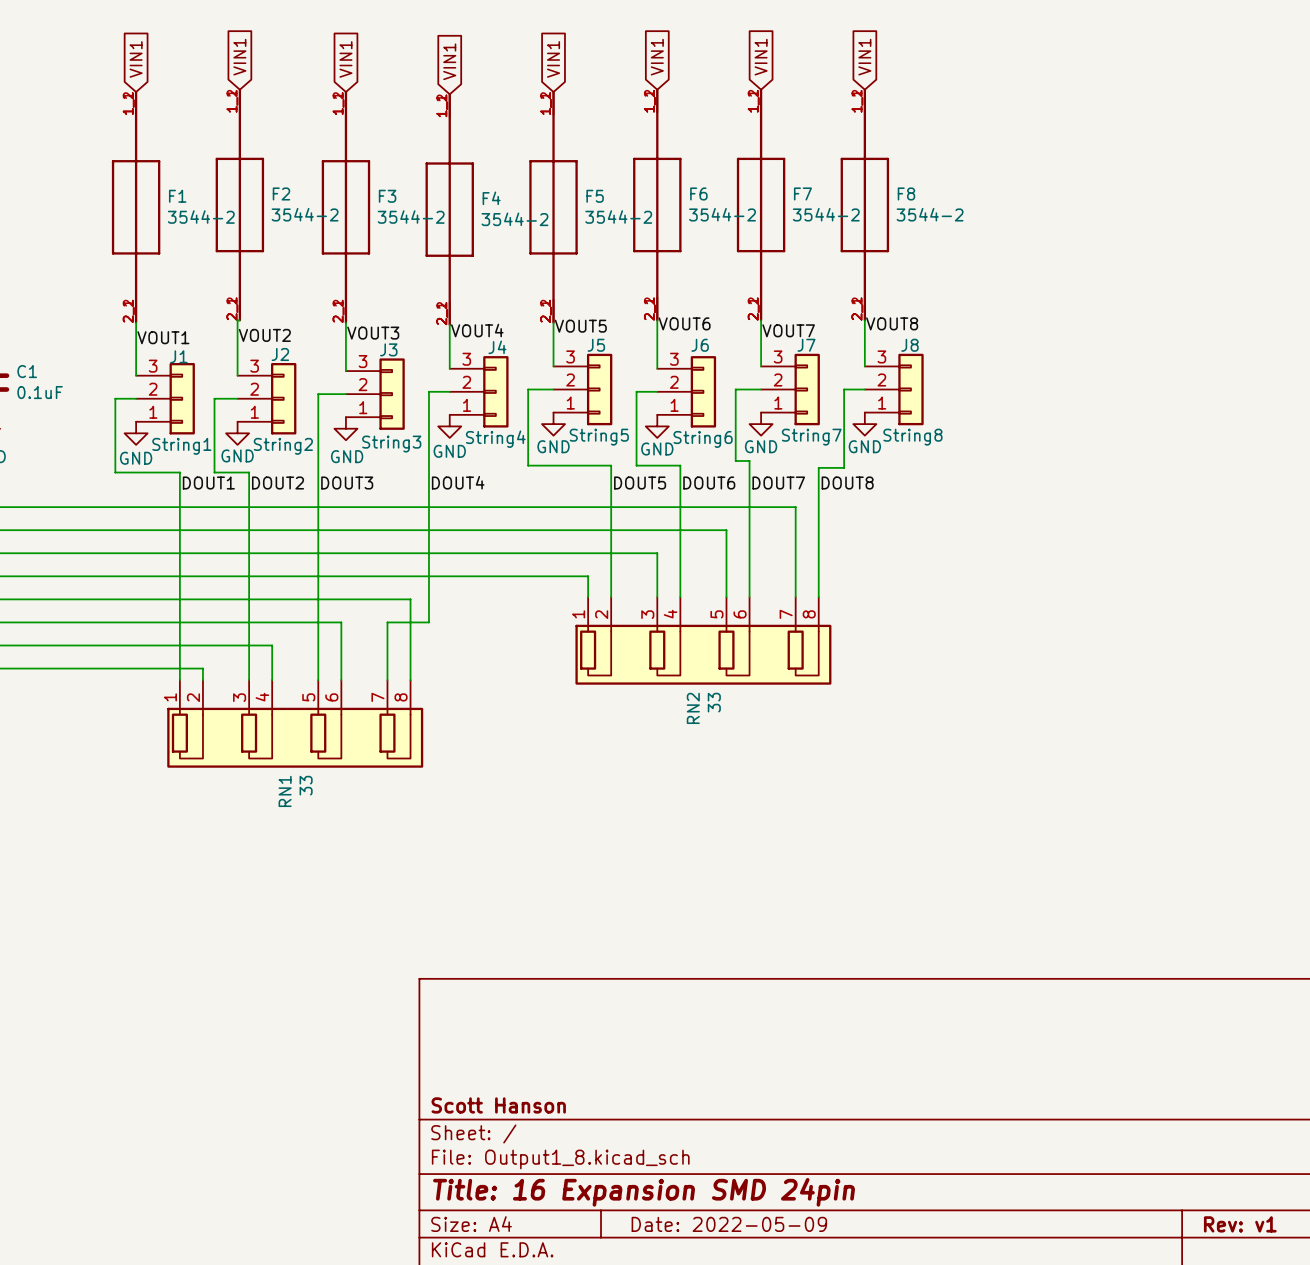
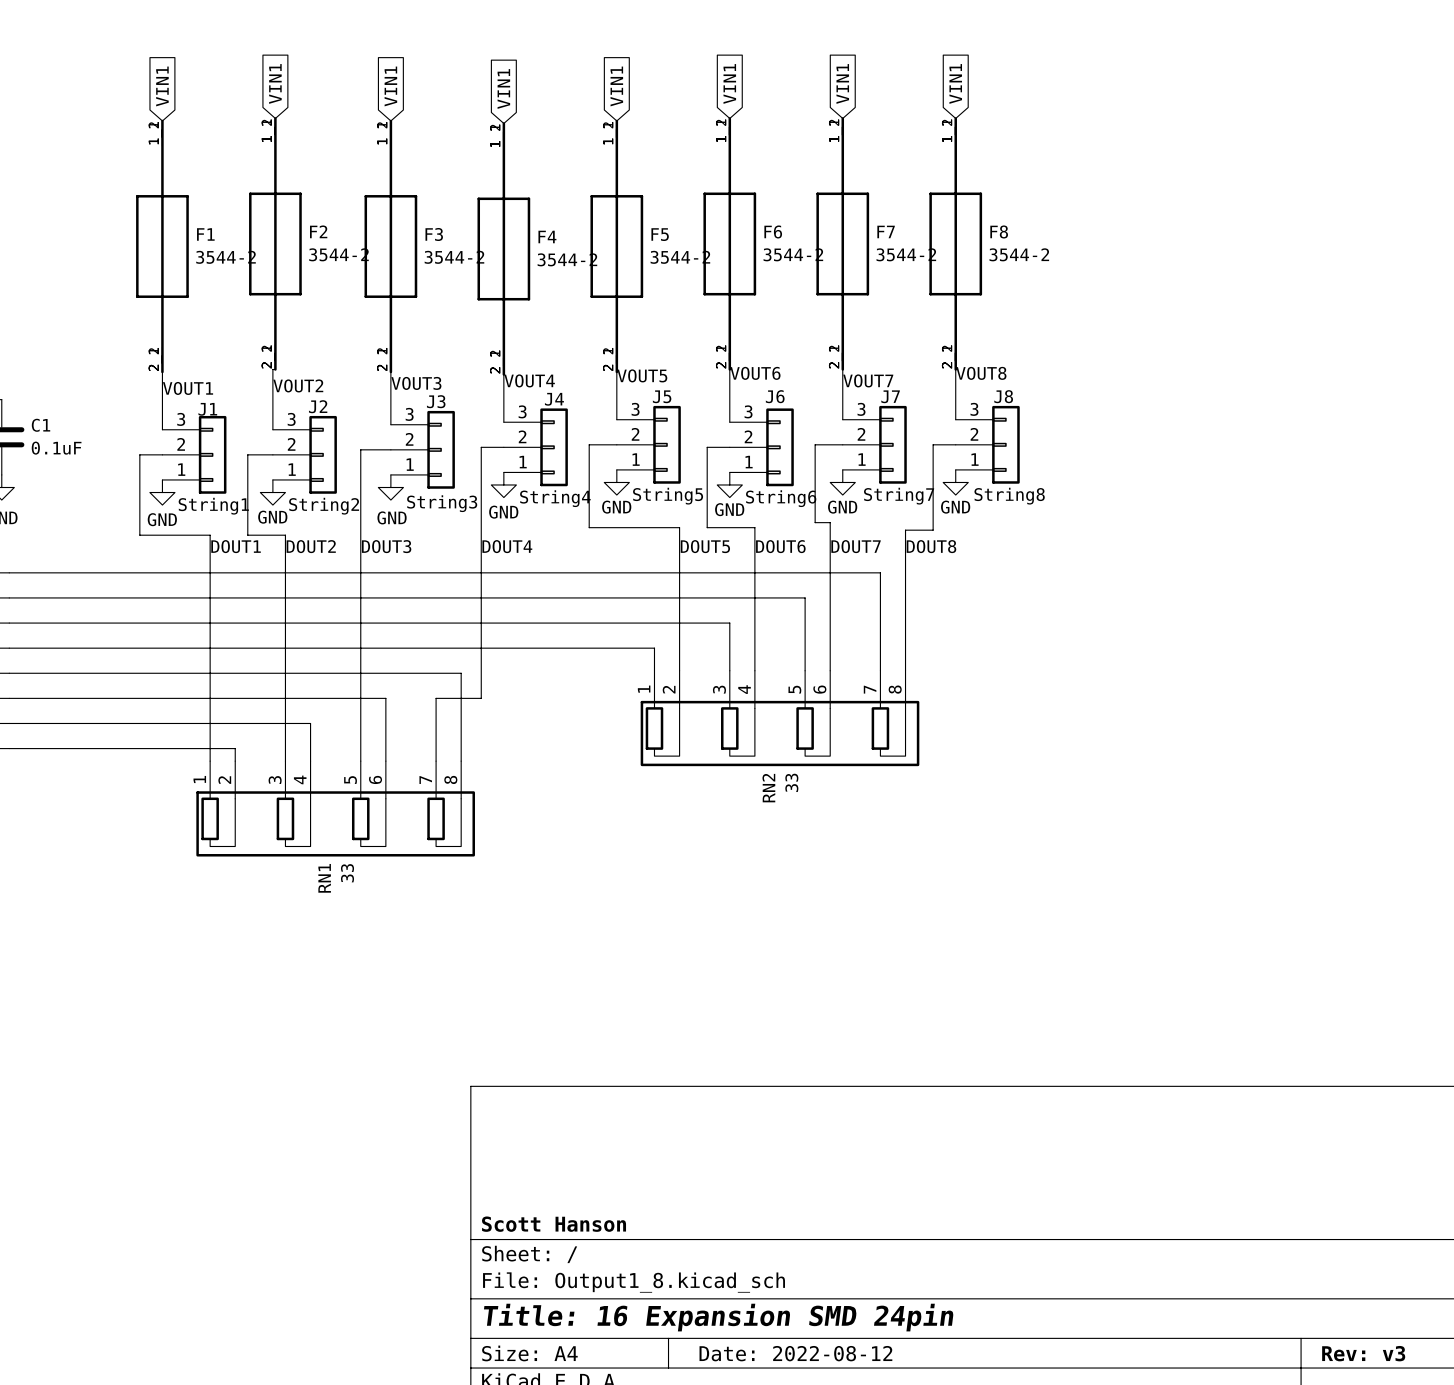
title block: Date: 2022-05-09 (729, 1224) -> Date: 2022-08-12 (795, 1353)
title block: Rev: v1 (1240, 1224) -> Rev: v3 (1363, 1353)

